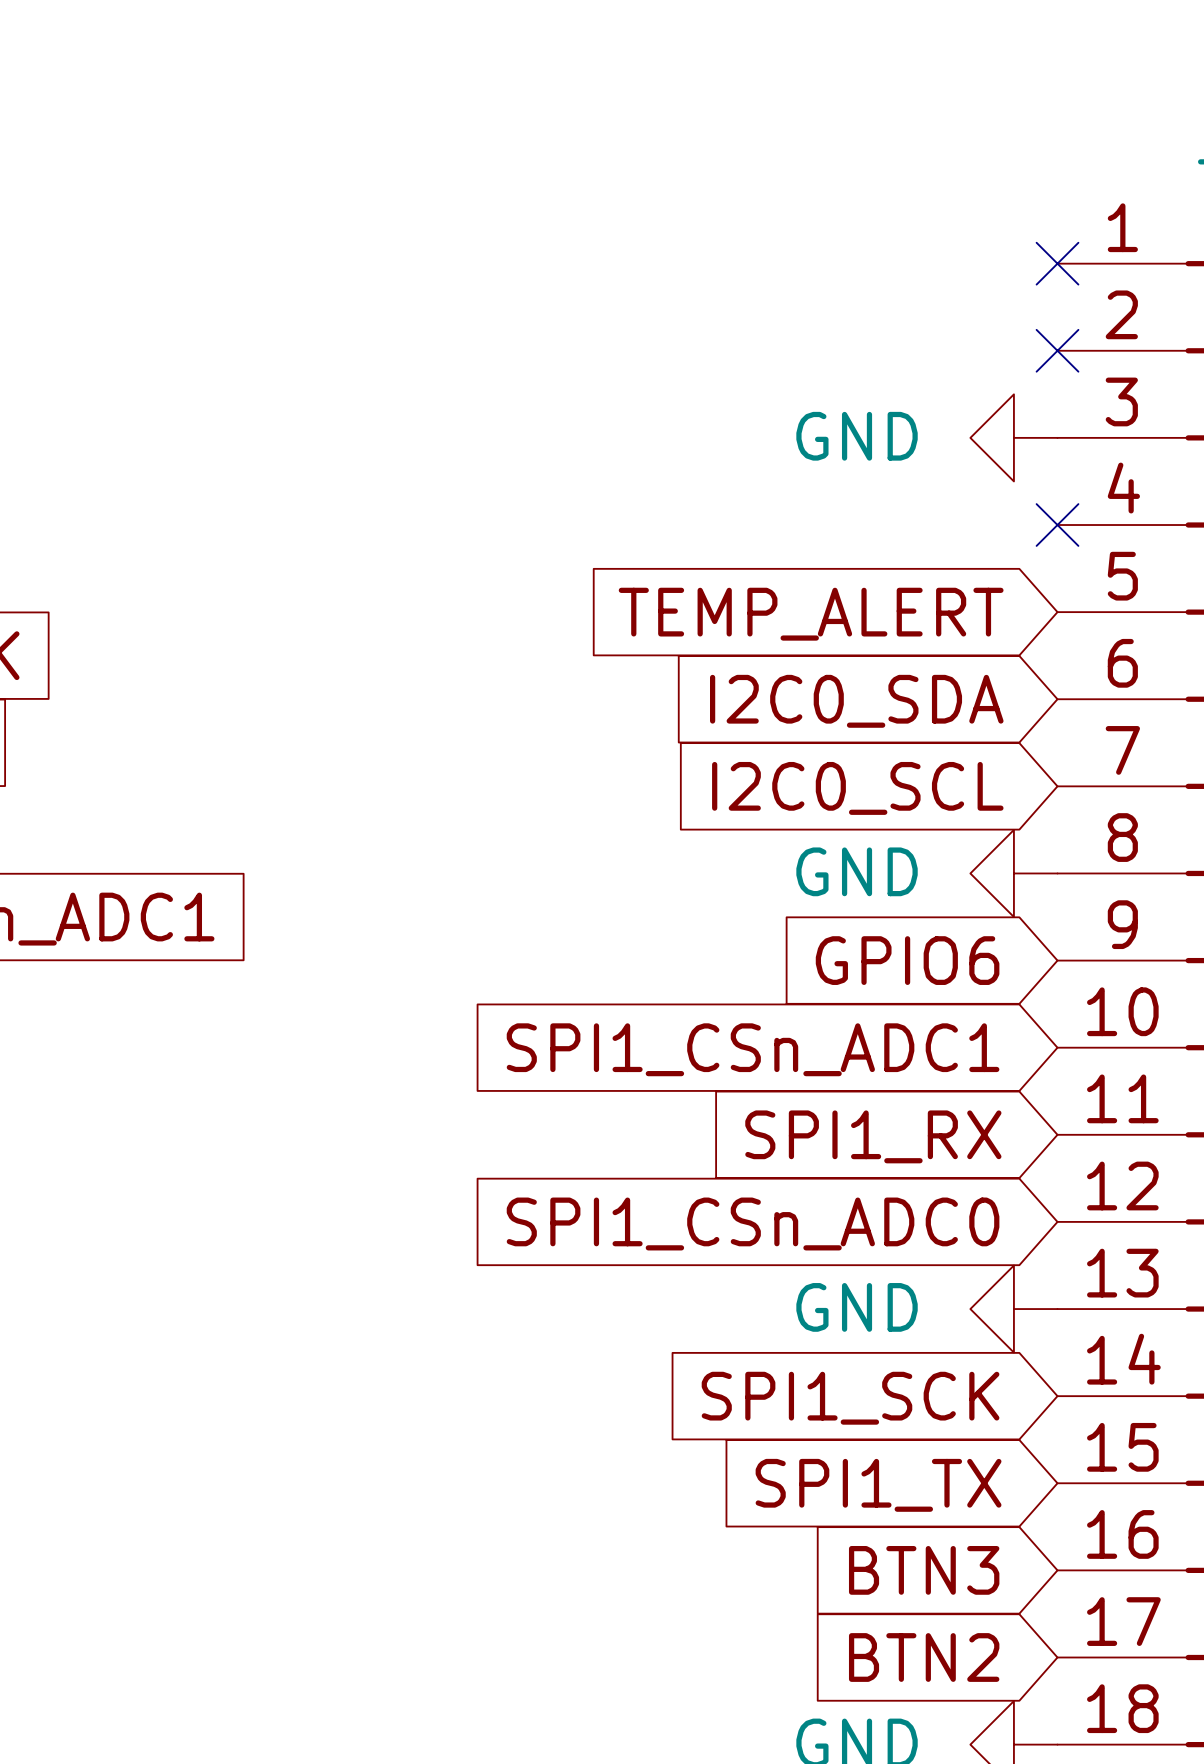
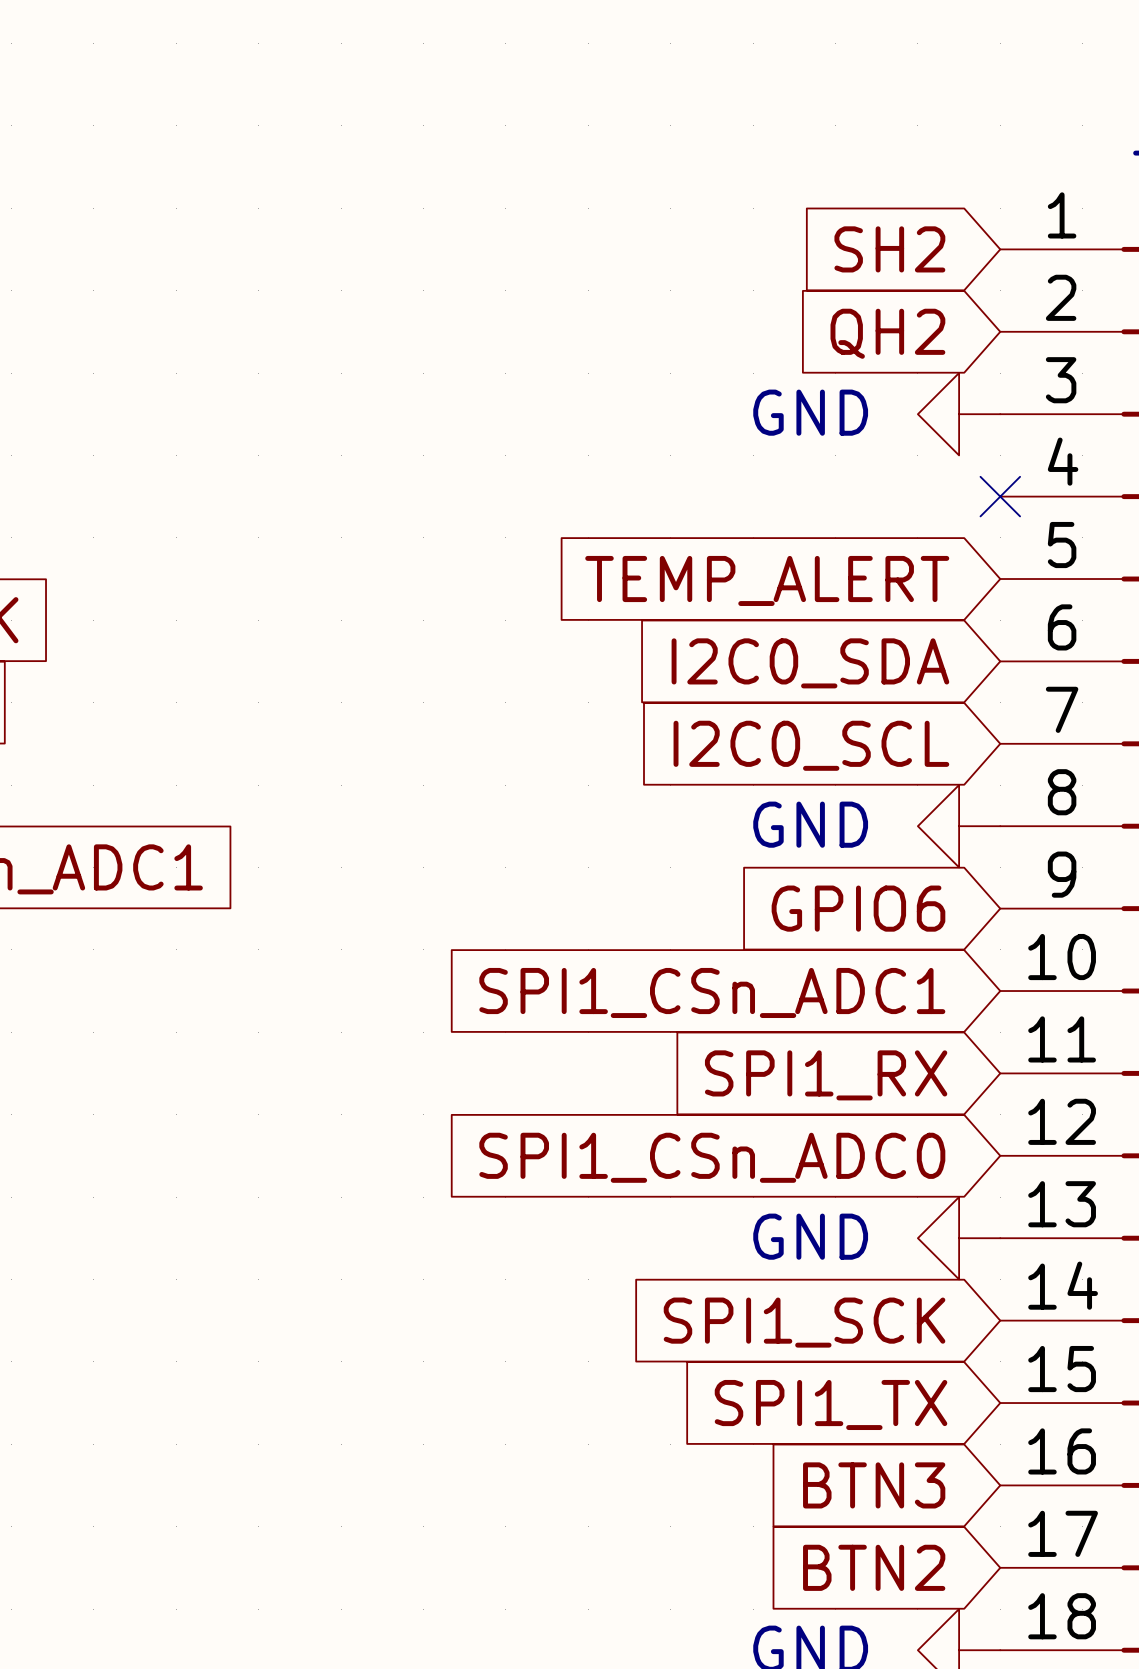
global label: none -> SH2 (889, 249)
no-connect mark: (1057, 263) -> none
no-connect mark: (1057, 350) -> none
global label: none -> QH2 (887, 333)

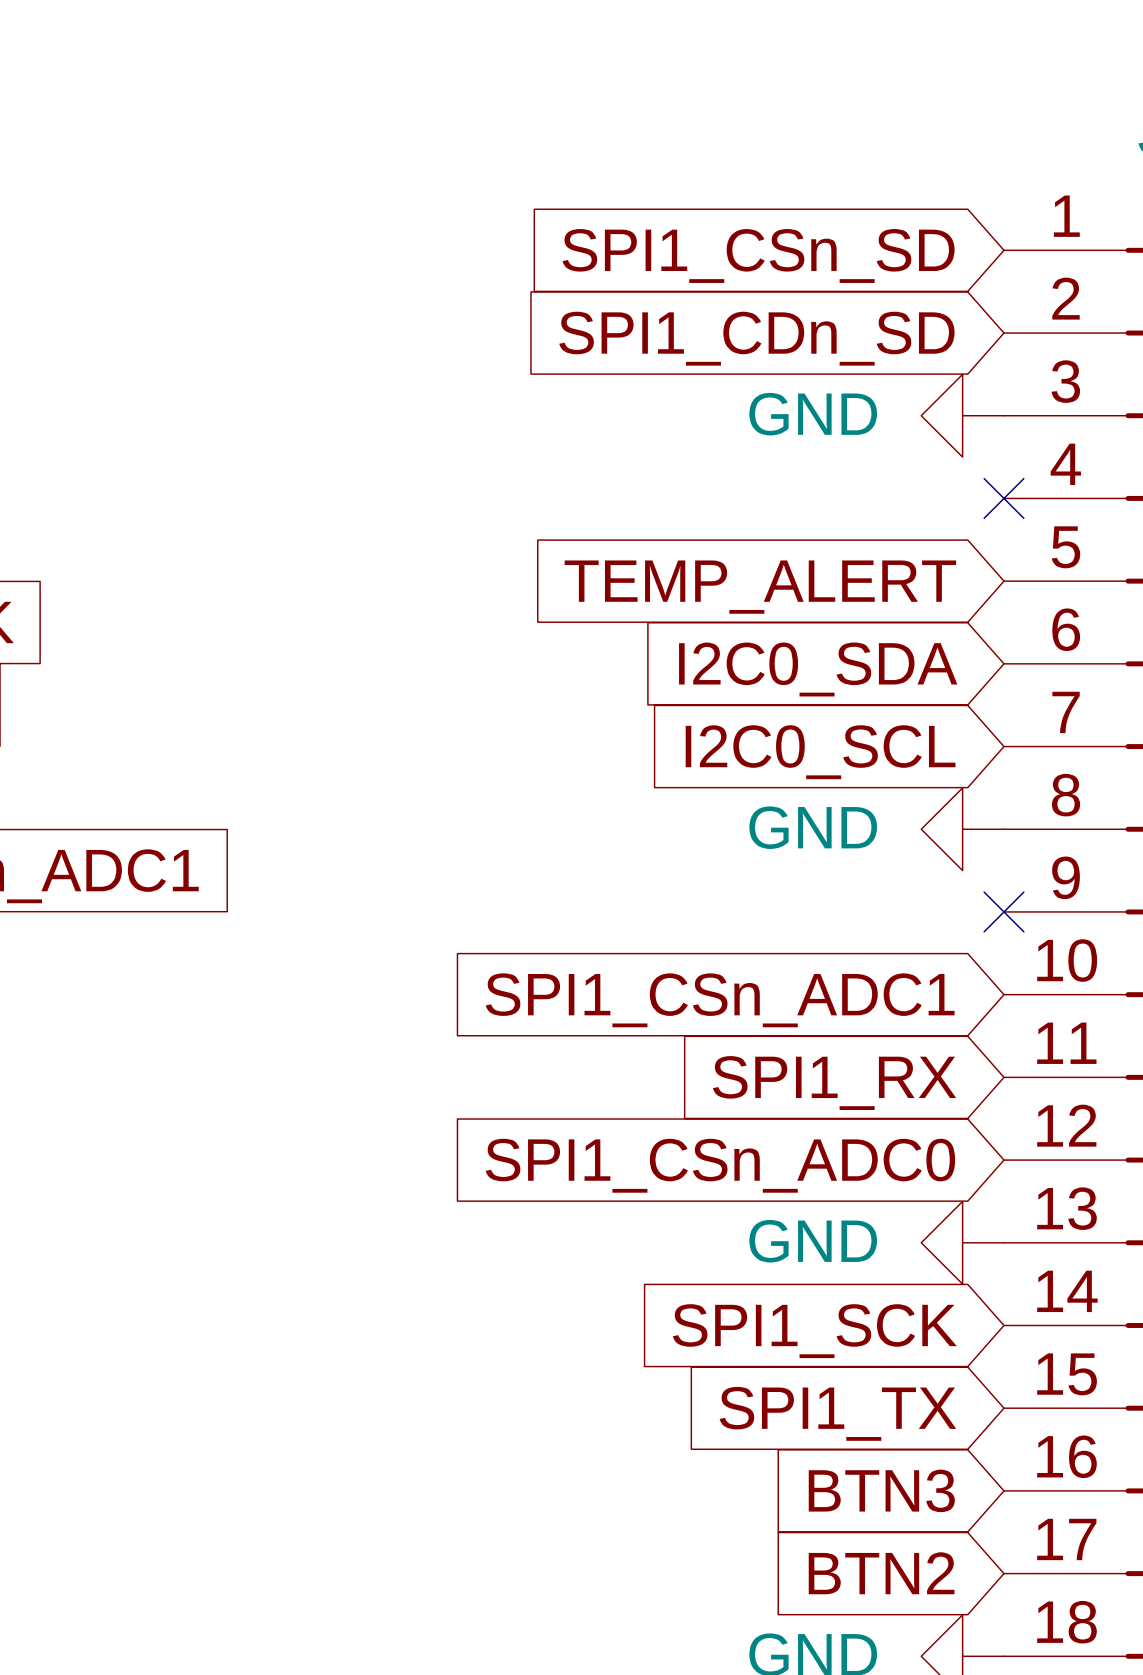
global label: SH2 (889, 249) -> SPI1_CSn_SD (758, 255)
global label: QH2 (887, 333) -> SPI1_CDn_SD (756, 338)
global label: GPIO6 (858, 908) -> none
no-connect mark: none -> (1003, 911)

